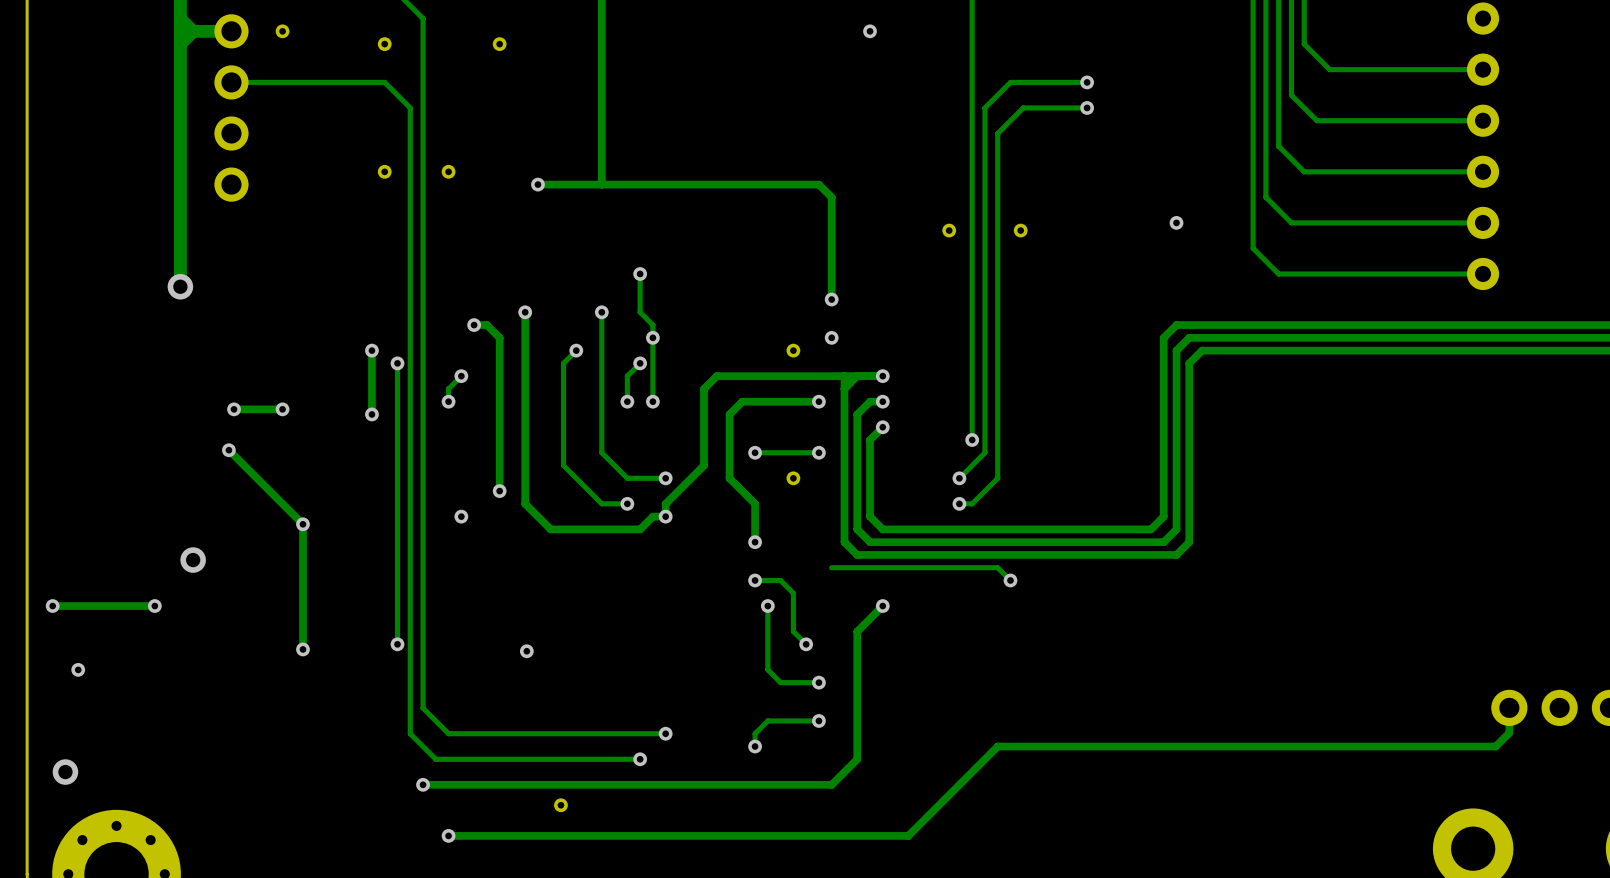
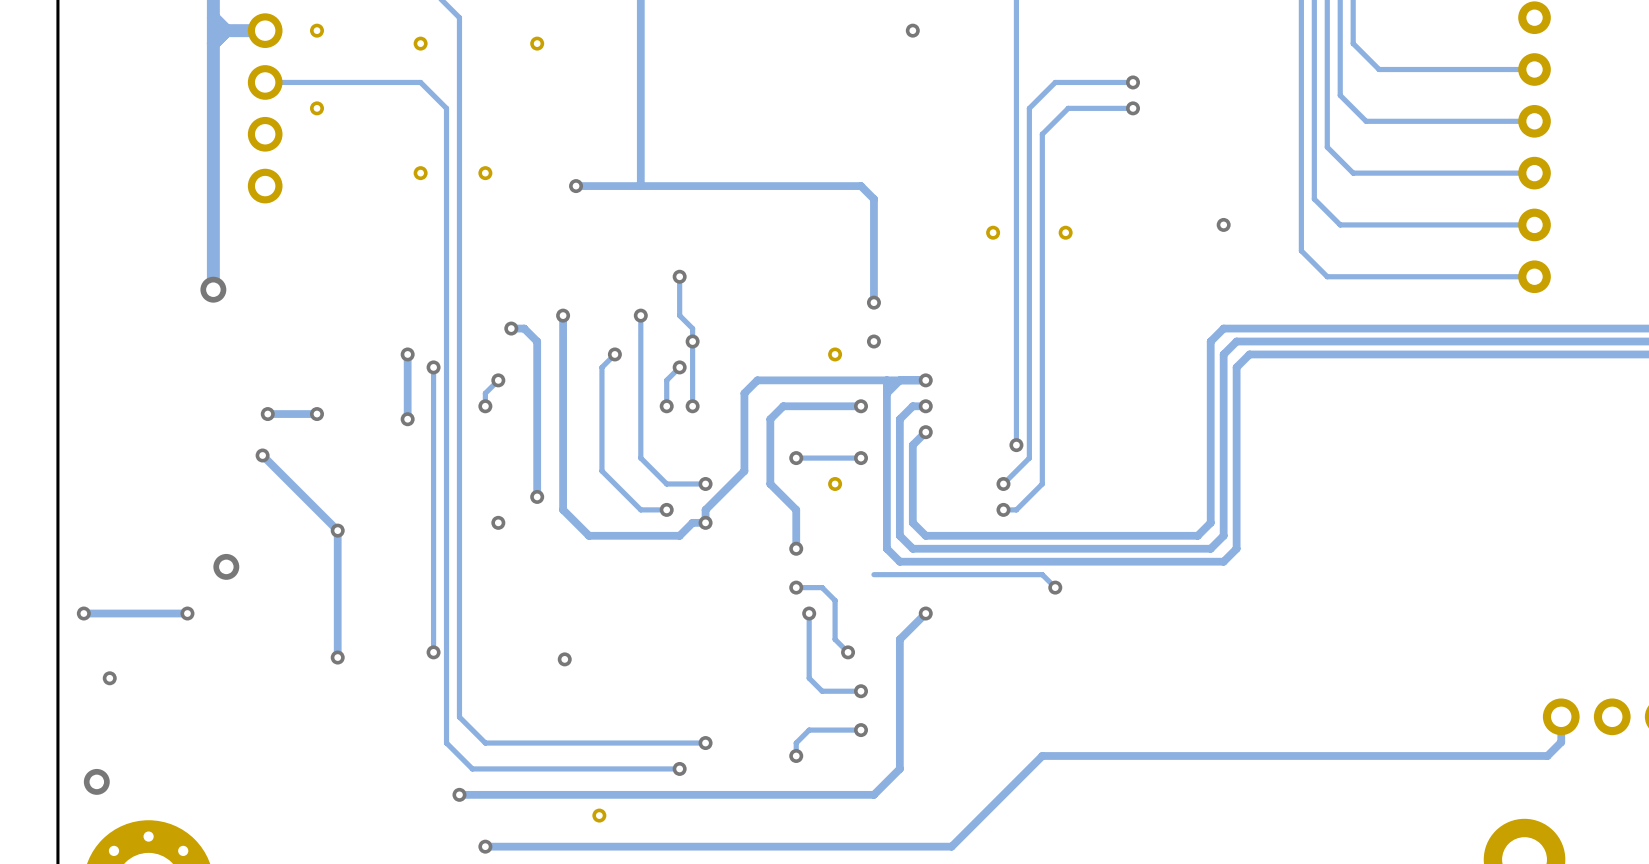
part: none -> (316, 108)

